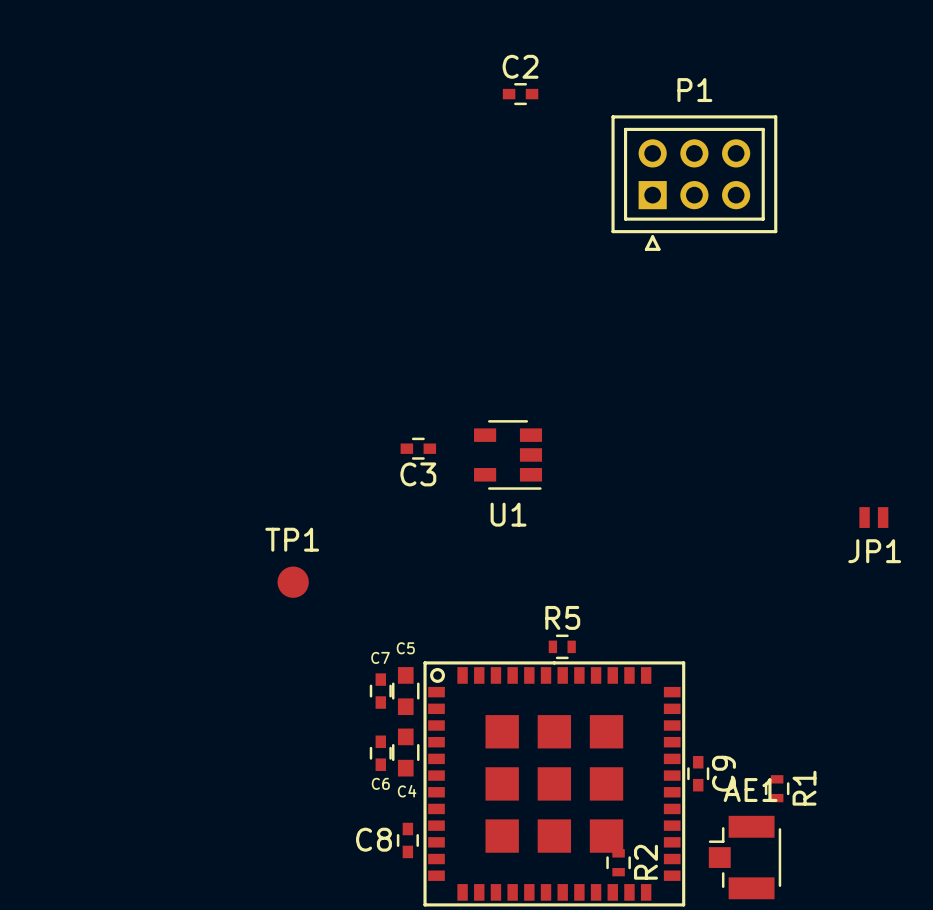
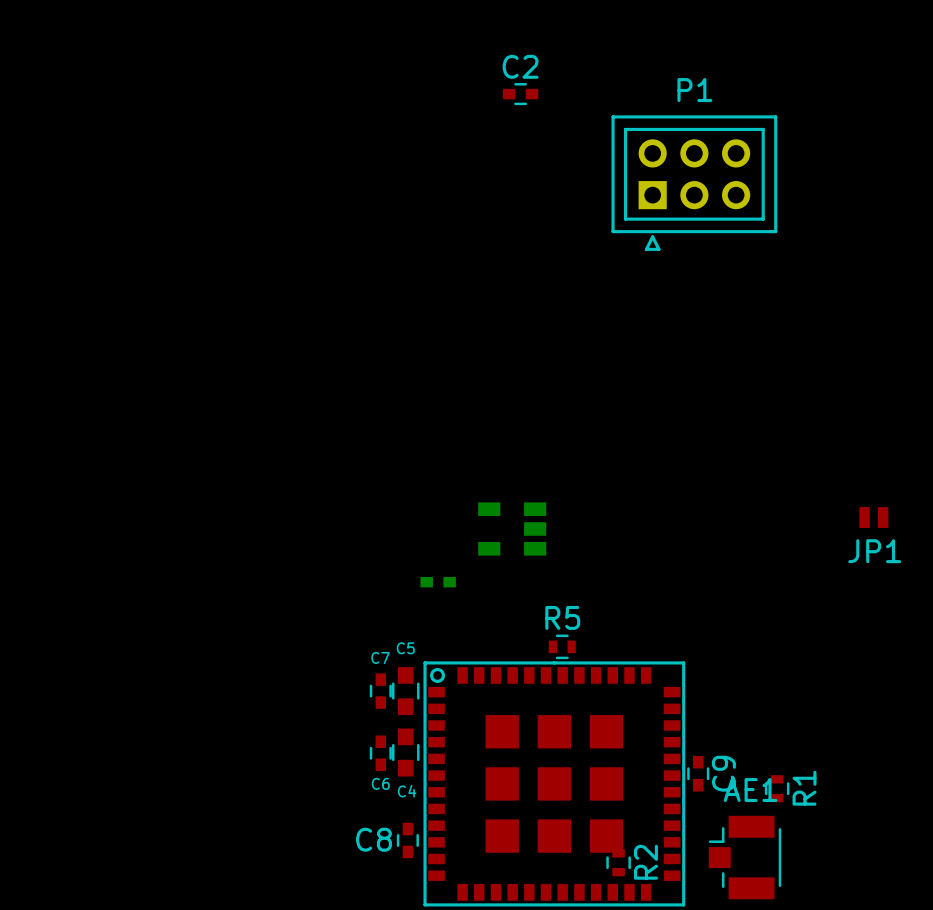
C3 side: top (418, 448) -> bottom (438, 582)
U1 side: top (508, 454) -> bottom (512, 529)
TP1: (293, 582) -> none

